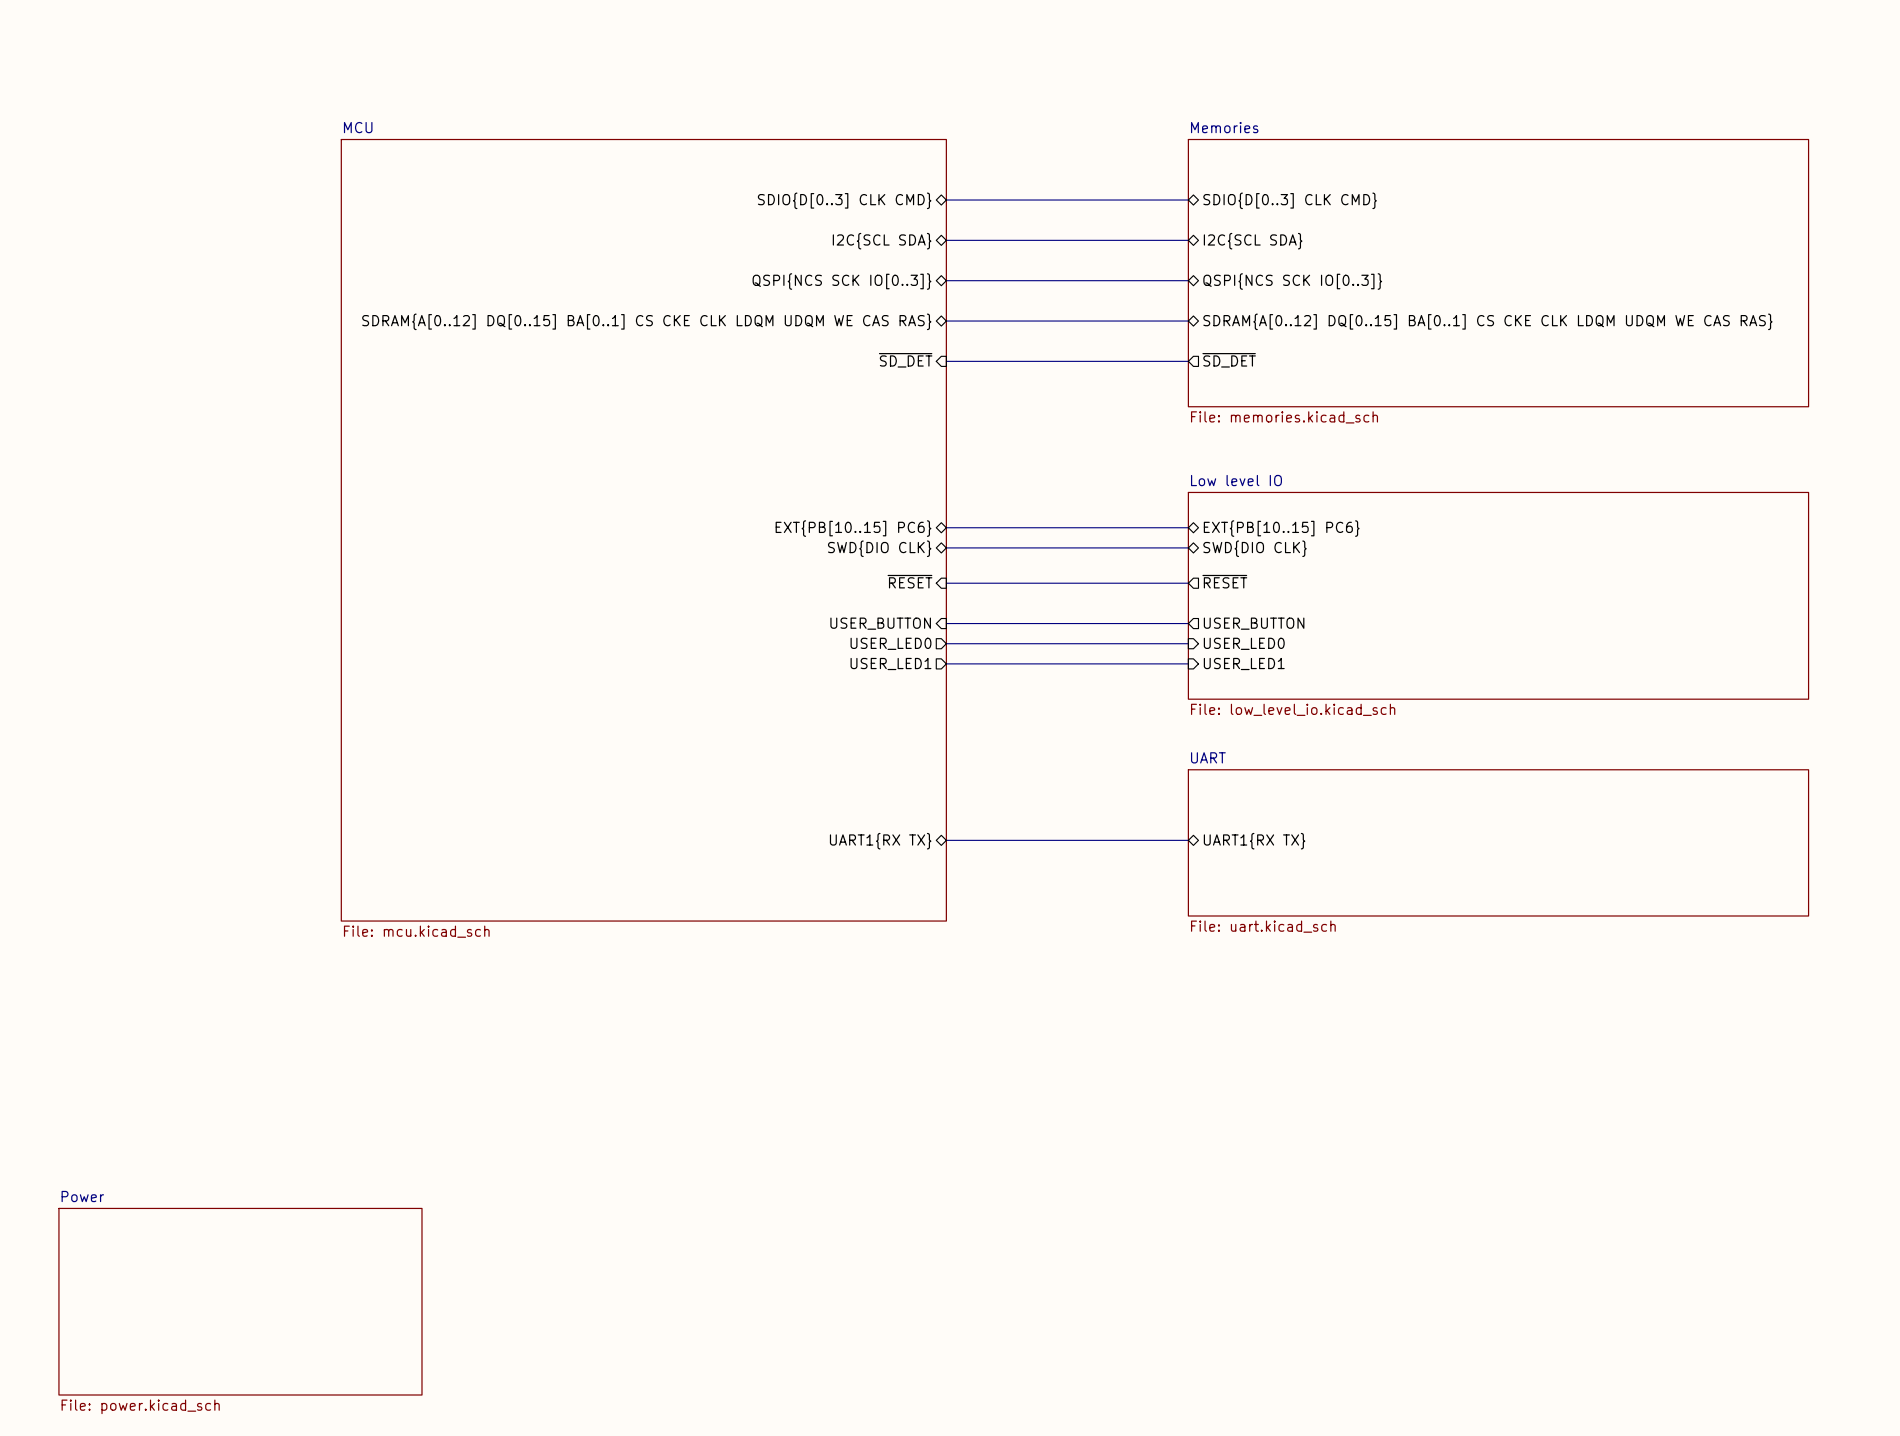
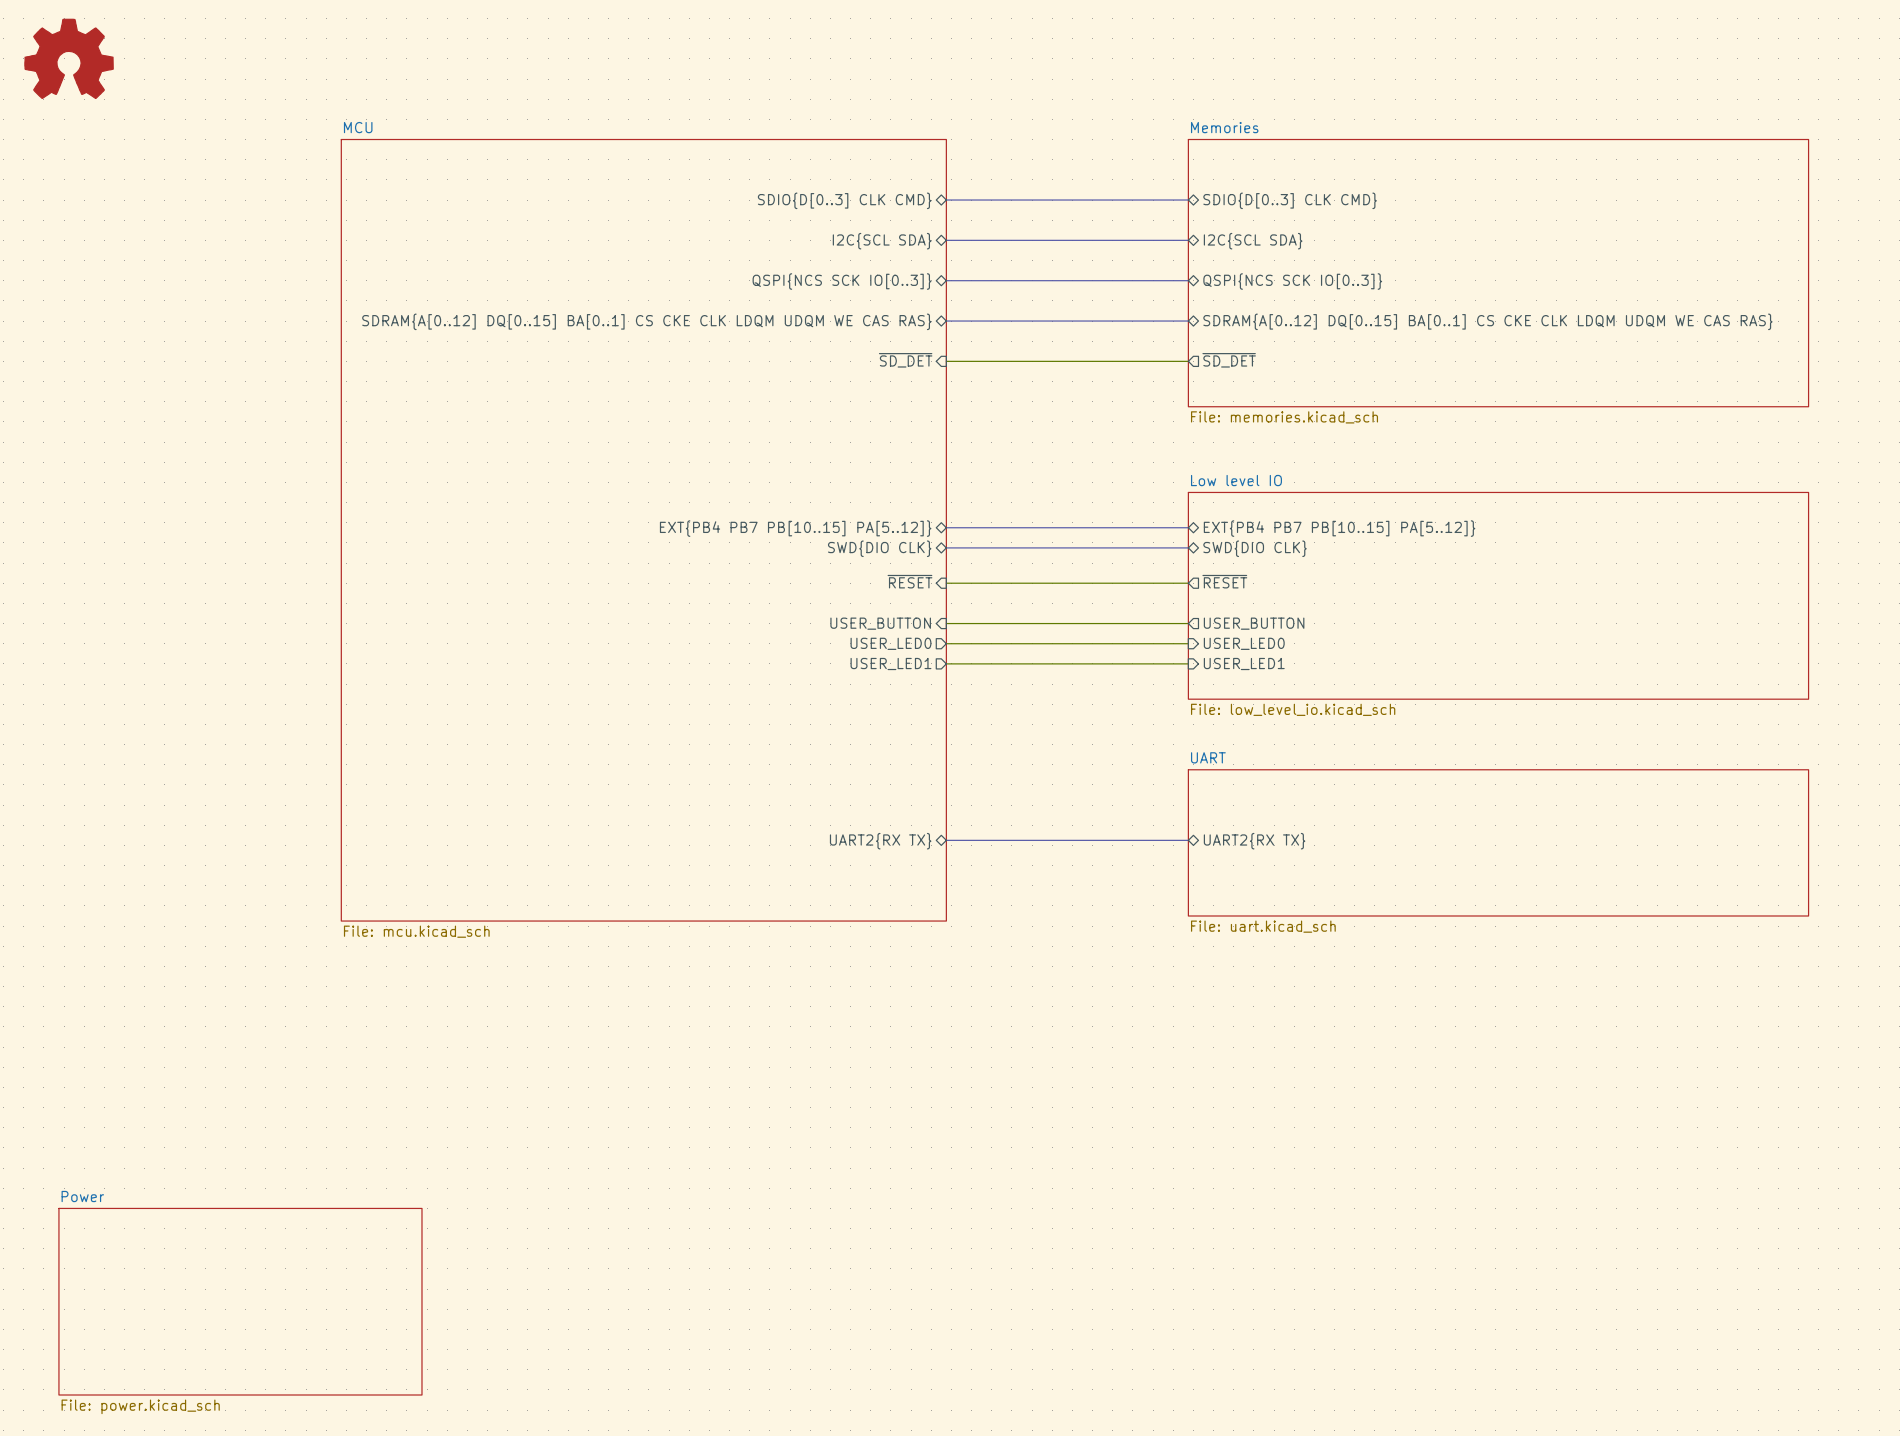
power symbol: none -> (69, 58)
sheet pin: EXT{PB[10..15] PC6} (853, 528) -> EXT{PB4 PB7 PB[10..15] PA[5..12]} (795, 528)
sheet pin: EXT{PB[10..15] PC6} (1281, 528) -> EXT{PB4 PB7 PB[10..15] PA[5..12]} (1339, 528)
sheet pin: UART1{RX TX} (880, 841) -> UART2{RX TX} (880, 841)
sheet pin: UART1{RX TX} (1254, 841) -> UART2{RX TX} (1254, 841)

